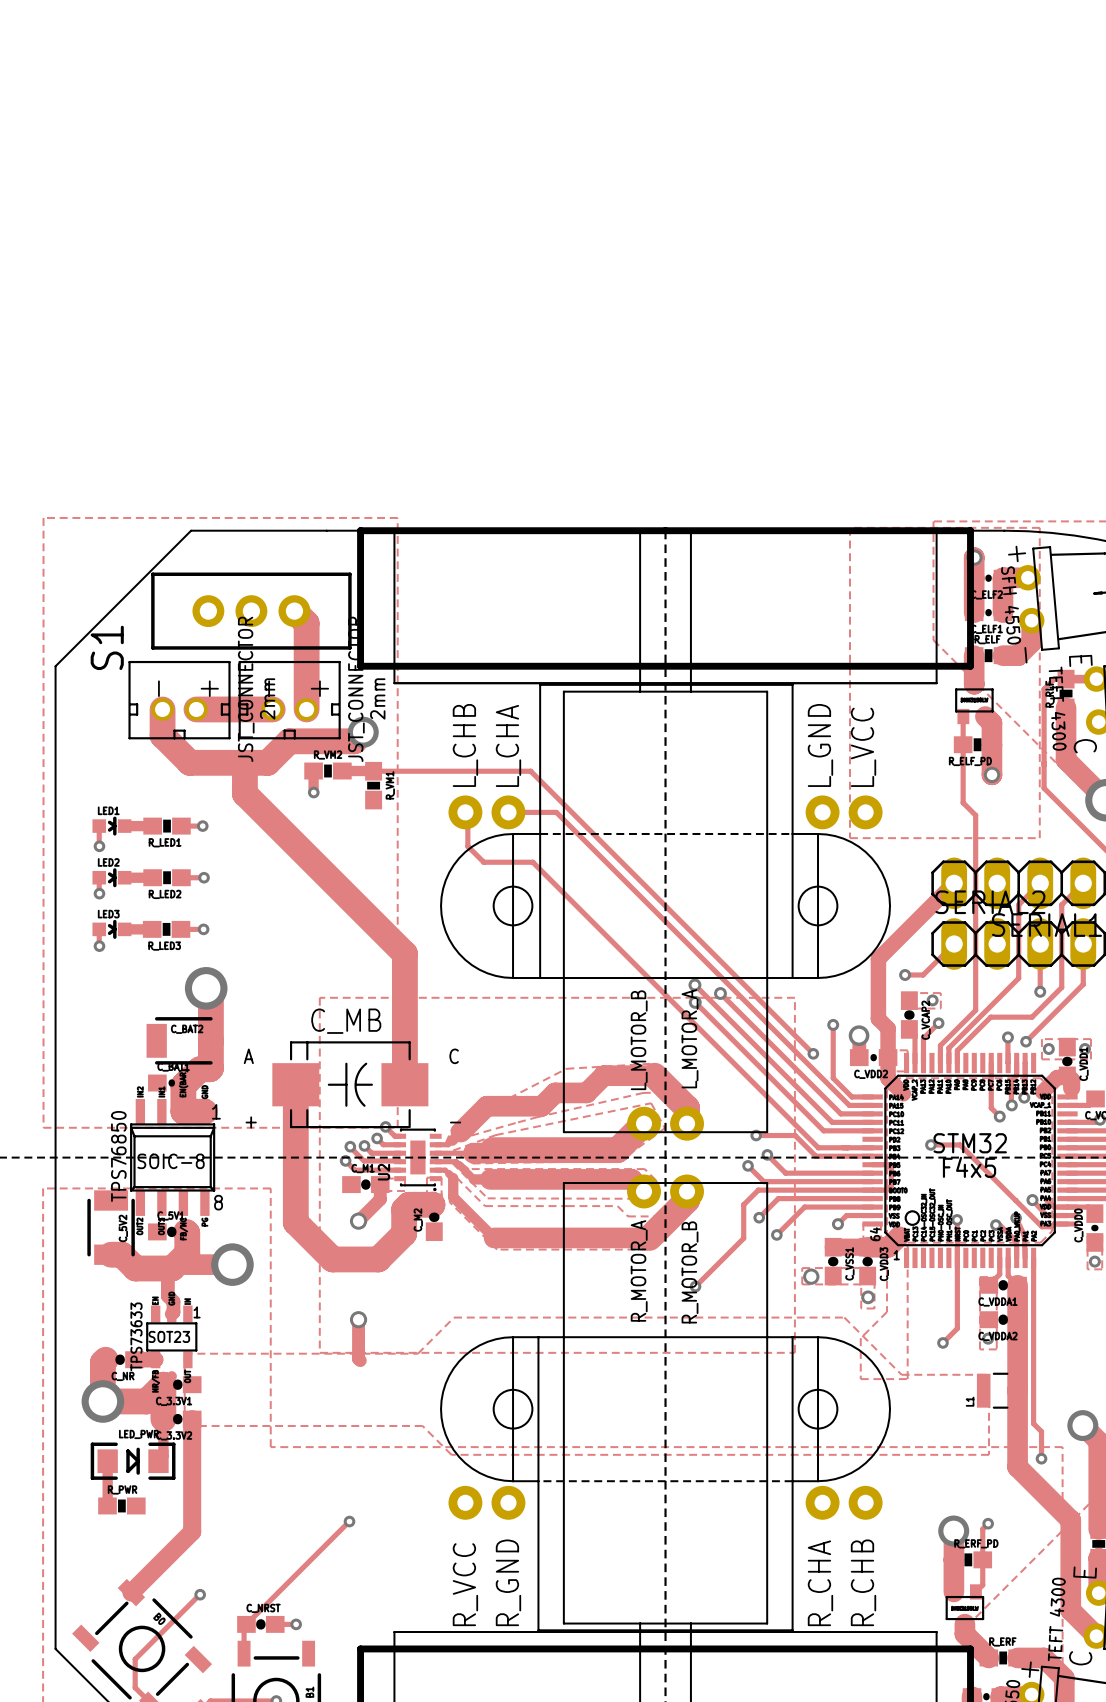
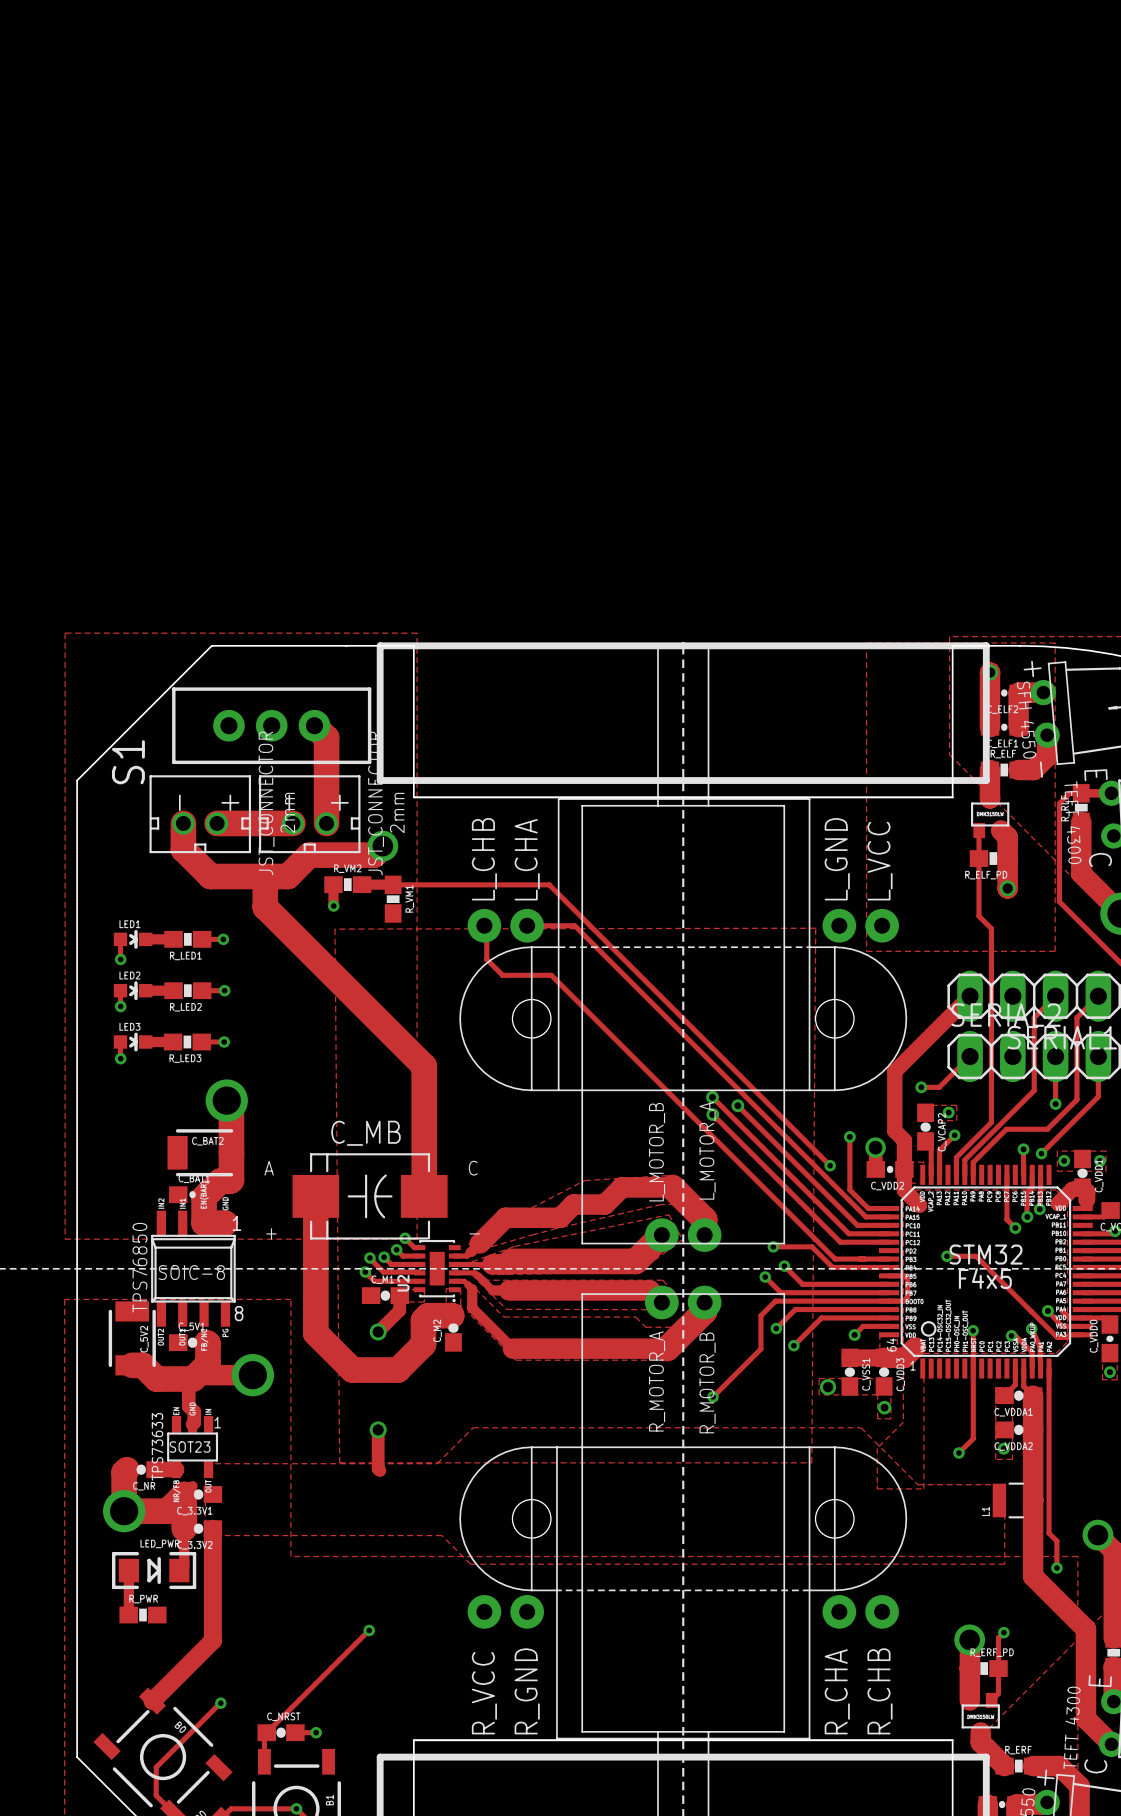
zone outline: (319, 1352) (319, 997) (794, 997) (794, 1352) -> (339, 1462) (334, 929) (815, 928) (811, 1462)

